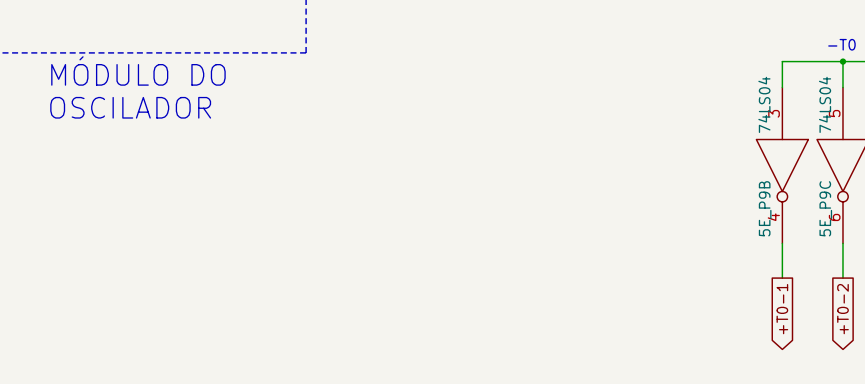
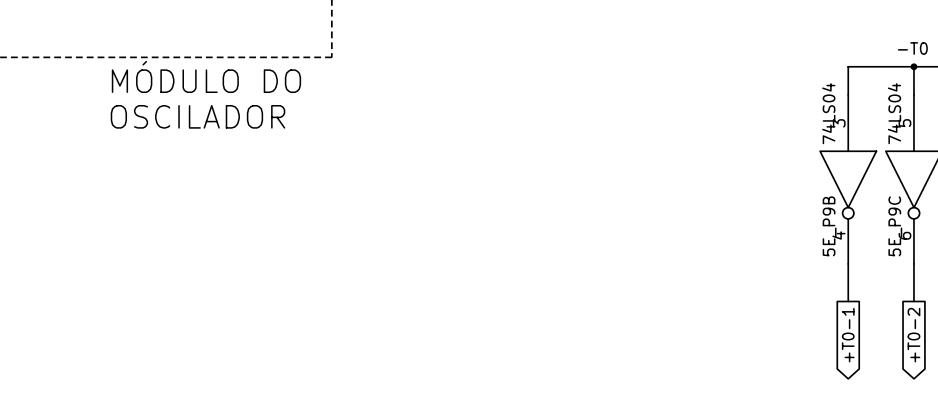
text position: MÓDULO DO (138, 70) -> MÓDULO DO (206, 76)
text position: OSCILADOR (130, 107) -> OSCILADOR (198, 116)

